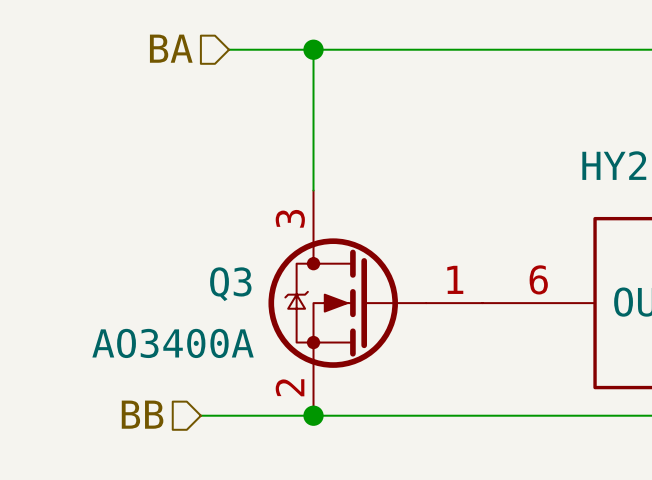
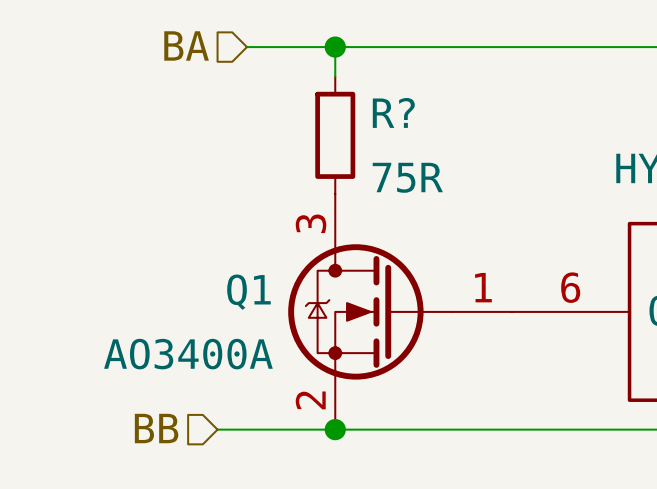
wire: (313, 77) (313, 190) -> none
R?: none -> 75R (335, 135)
Q3 name: Q3 (230, 284) -> Q1 (248, 292)

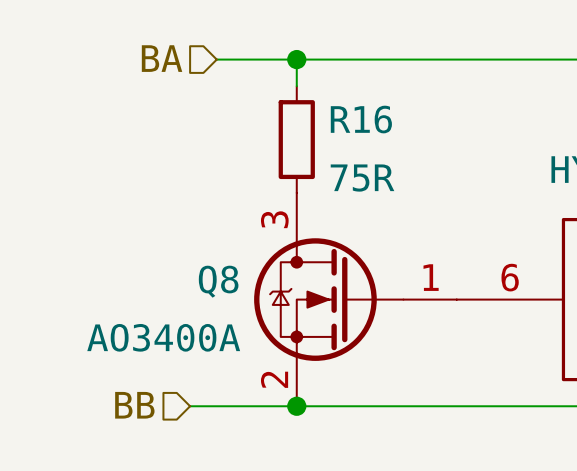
R? name: R? (393, 112) -> R16 (361, 119)
Q1 name: Q1 (248, 292) -> Q8 (218, 281)

